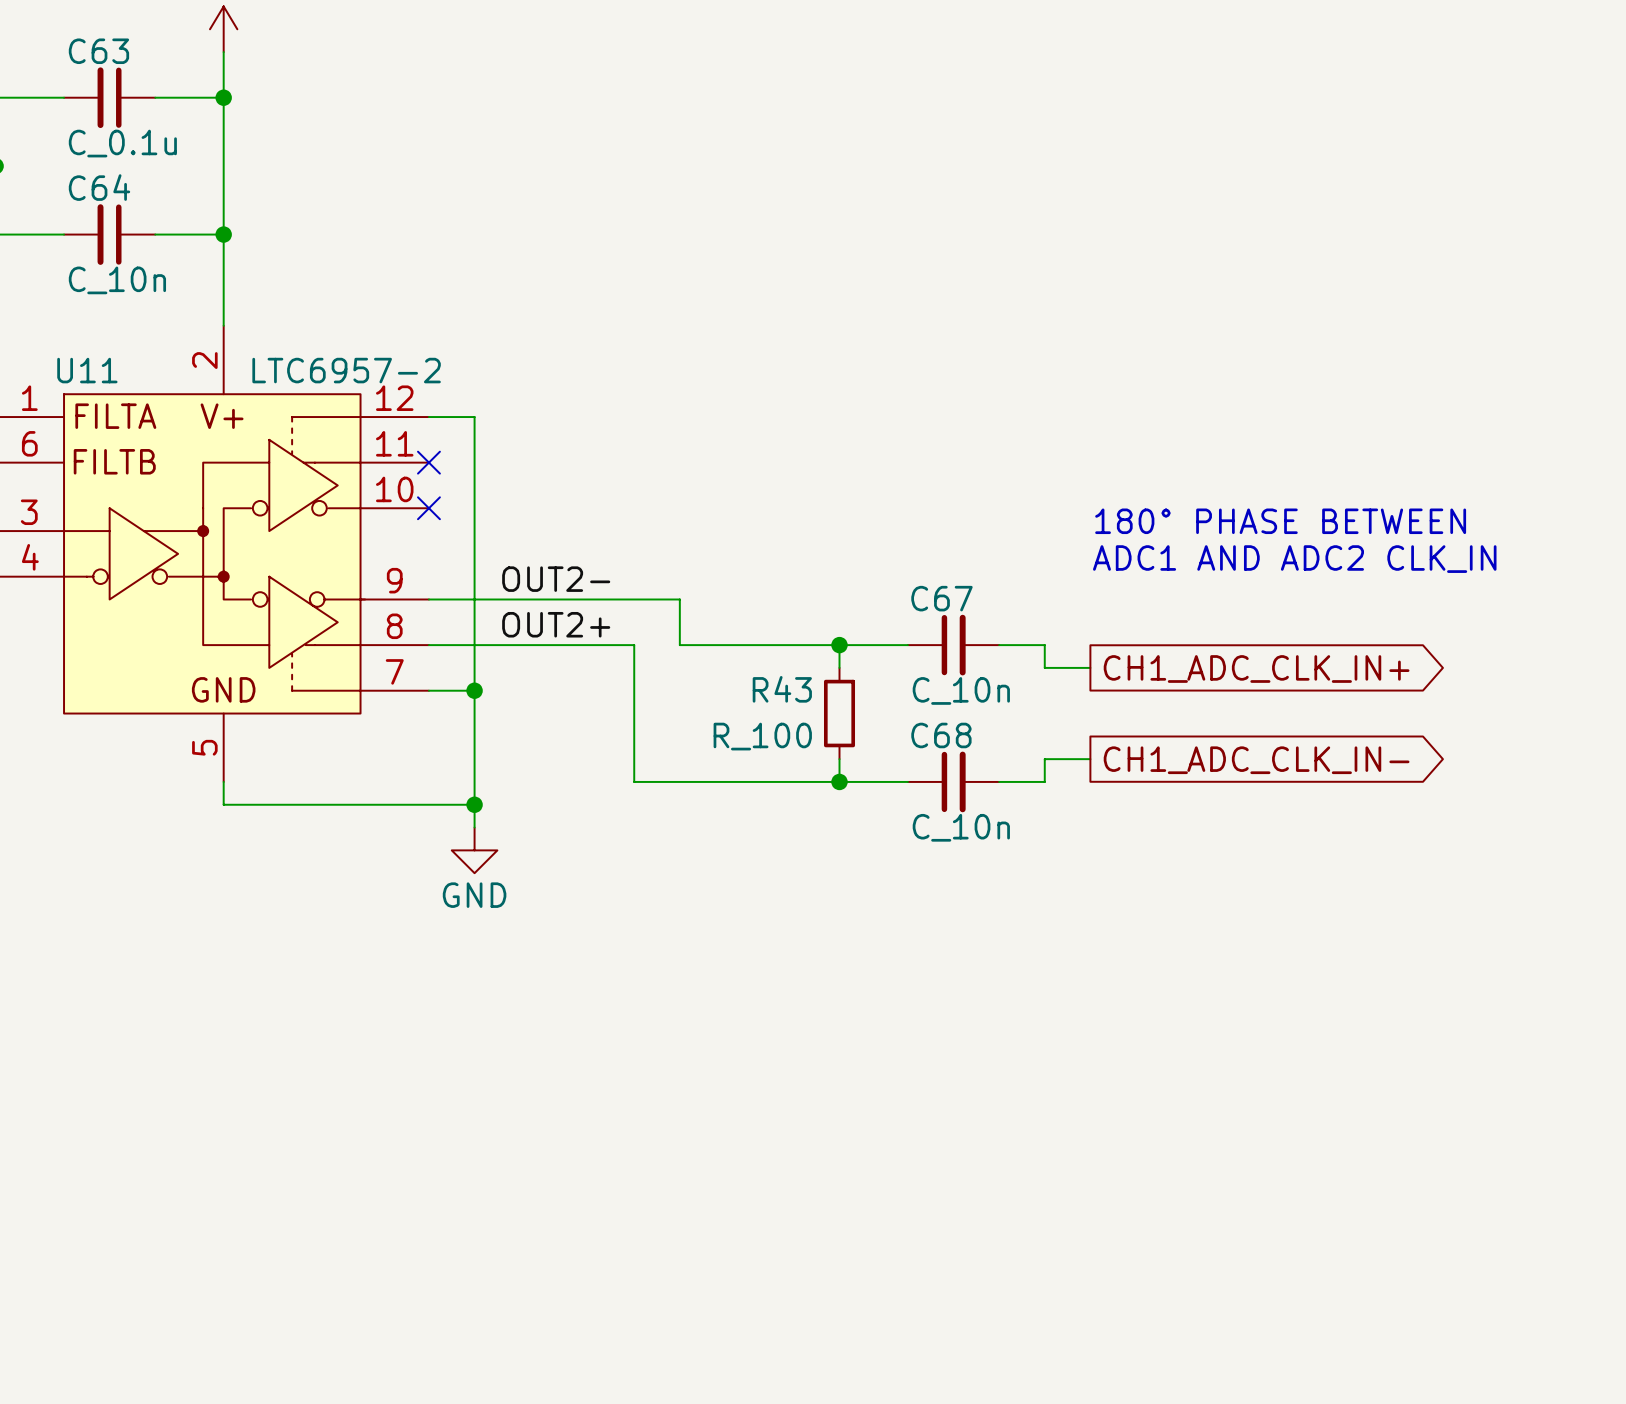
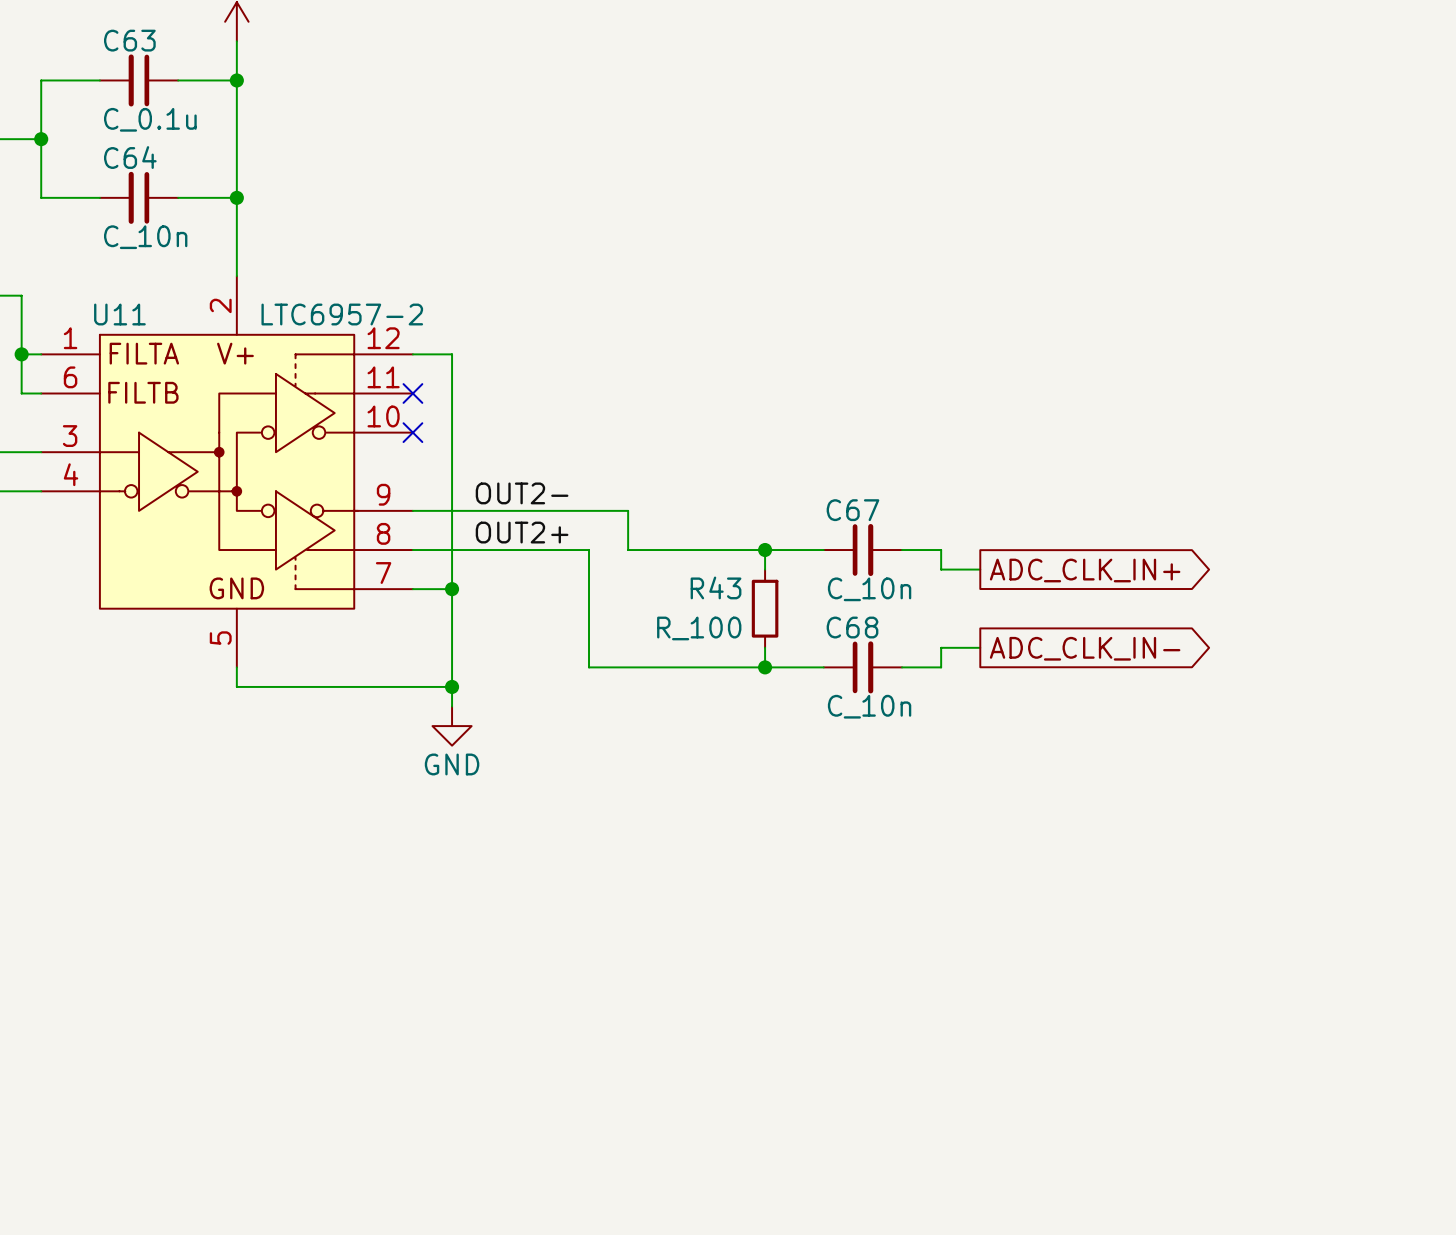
text: 180° PHASE BETWEEN (1280, 521) -> none
text: ADC1 AND ADC2 CLK_IN (1294, 559) -> none
global label: CH1_ADC_CLK_IN+ (1256, 669) -> ADC_CLK_IN+ (1085, 570)
global label: CH1_ADC_CLK_IN- (1256, 760) -> ADC_CLK_IN- (1085, 648)

